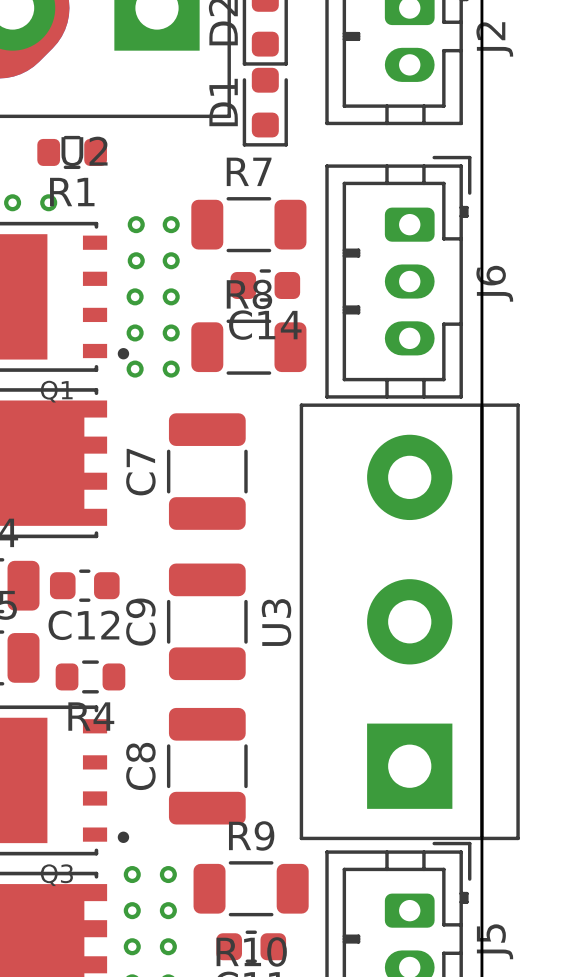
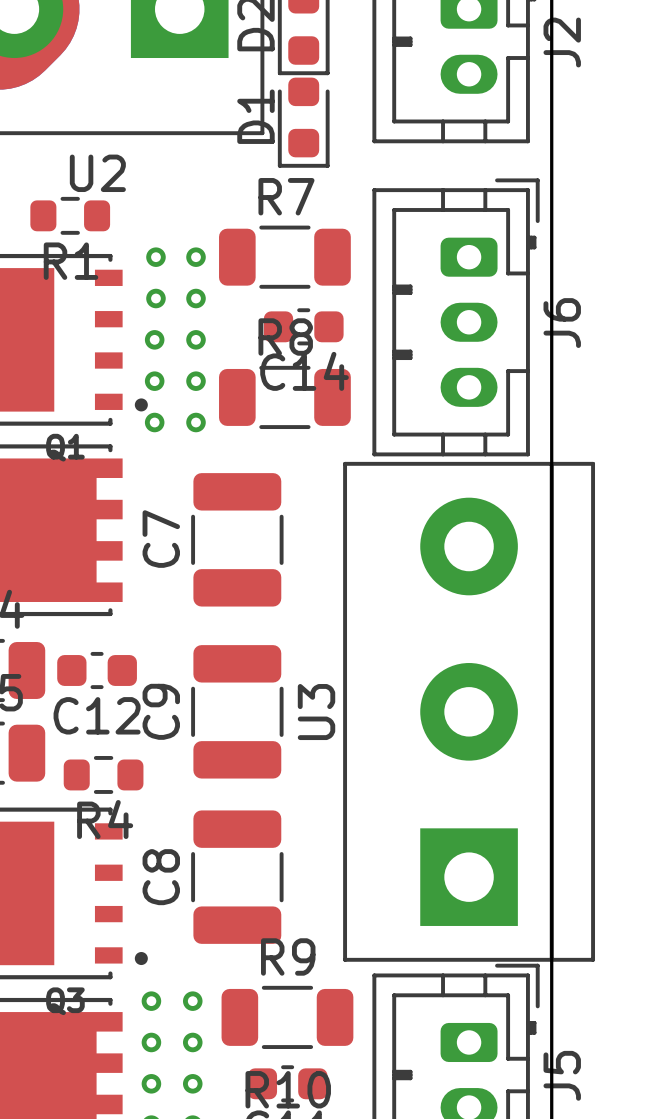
R1 position: (72, 152) -> (70, 215)
via: (12, 202) -> none
via: (48, 202) -> none

